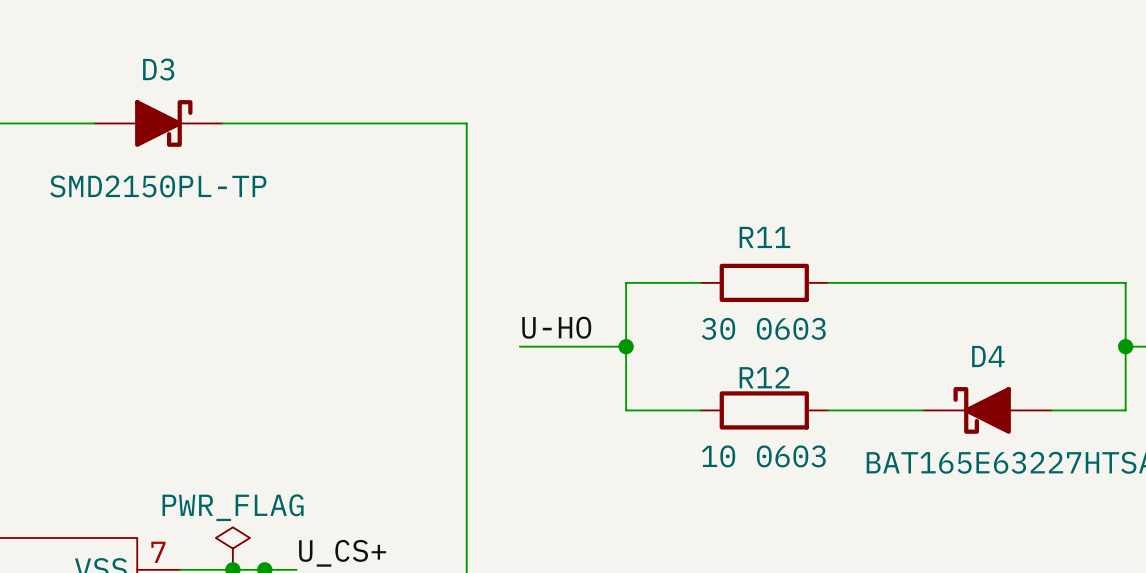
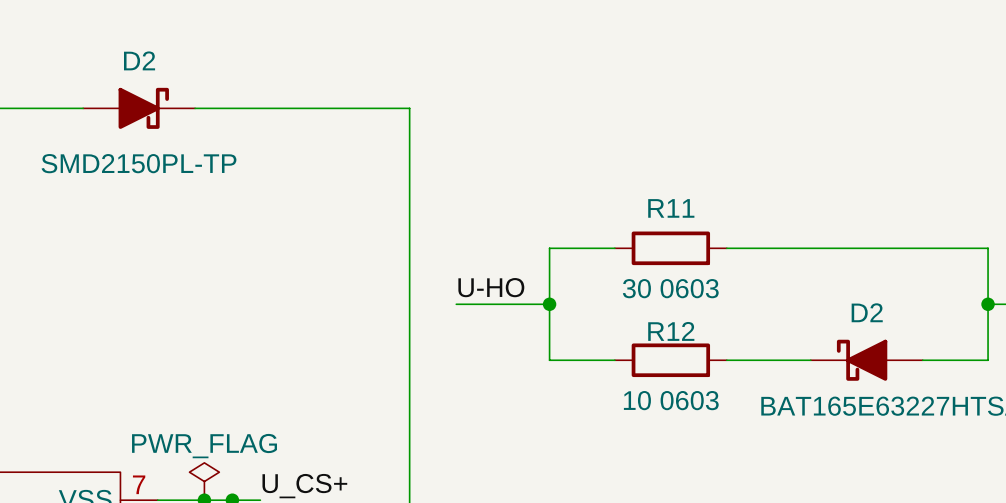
D3 name: D3 (158, 69) -> D2 (139, 60)
D4 name: D4 (988, 356) -> D2 (867, 312)

